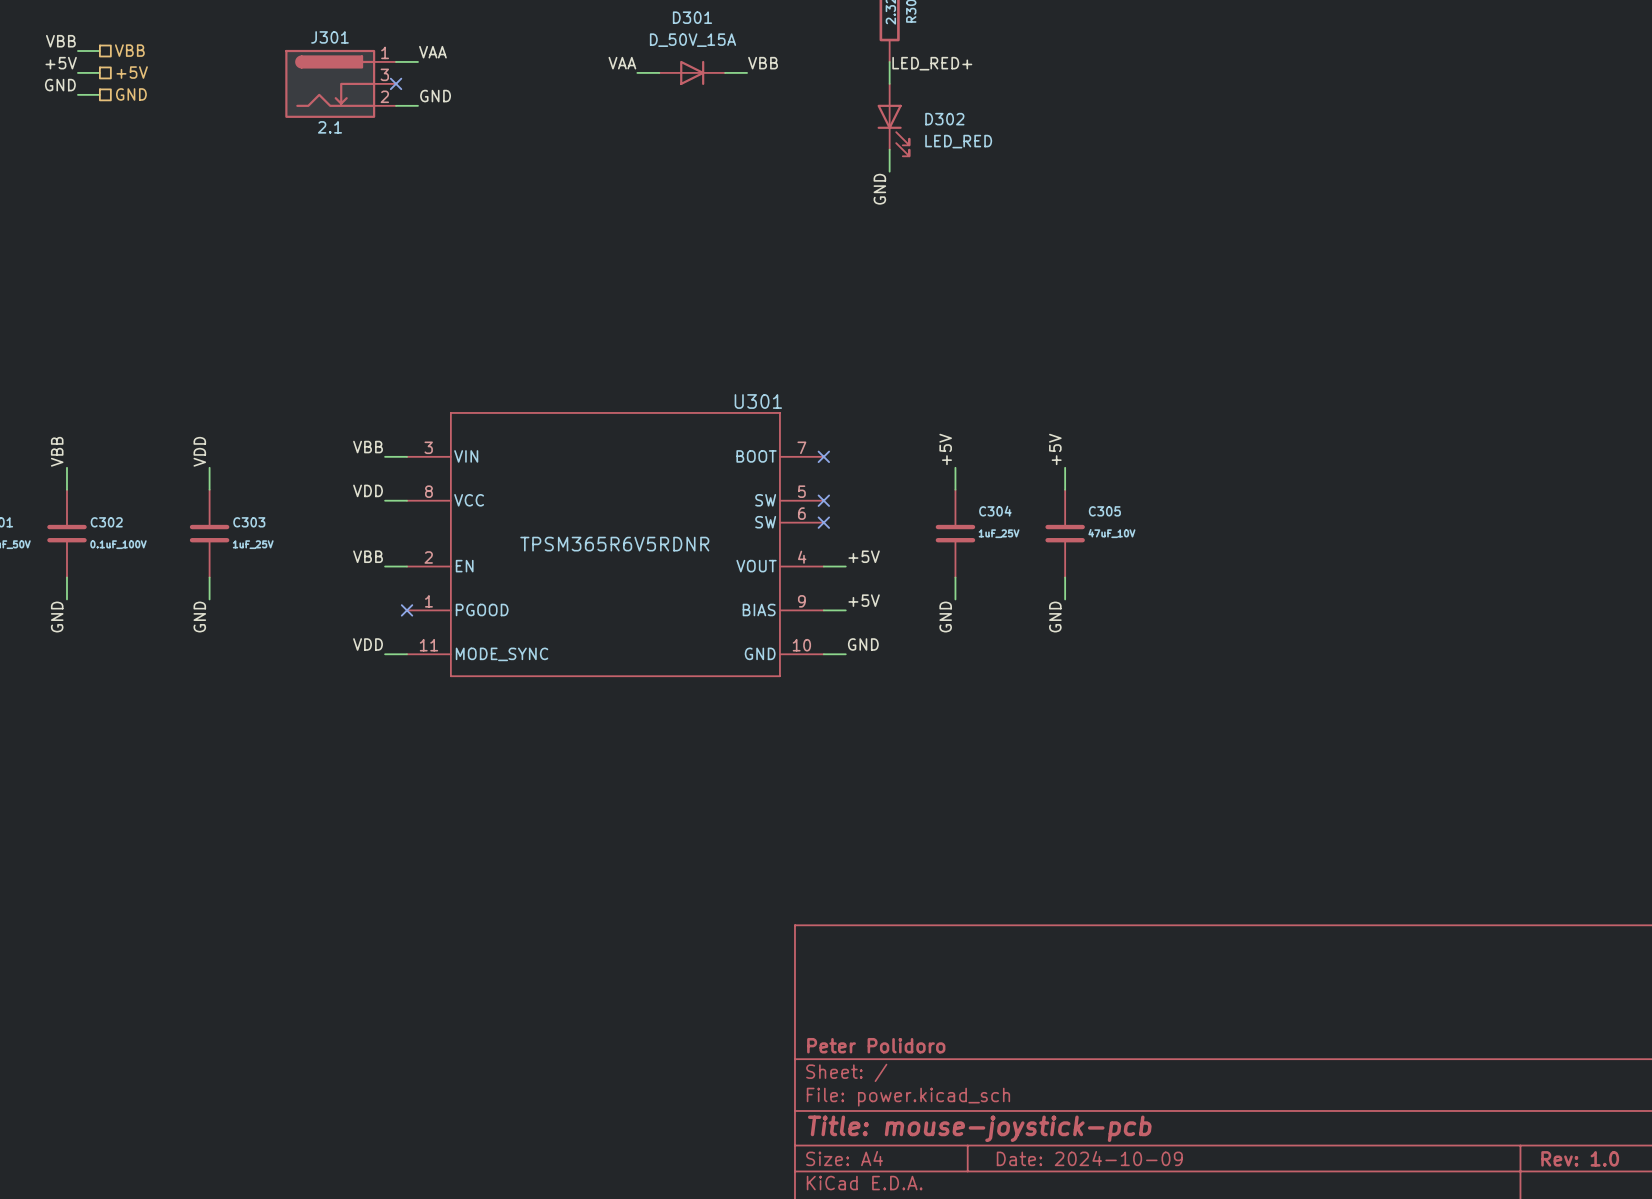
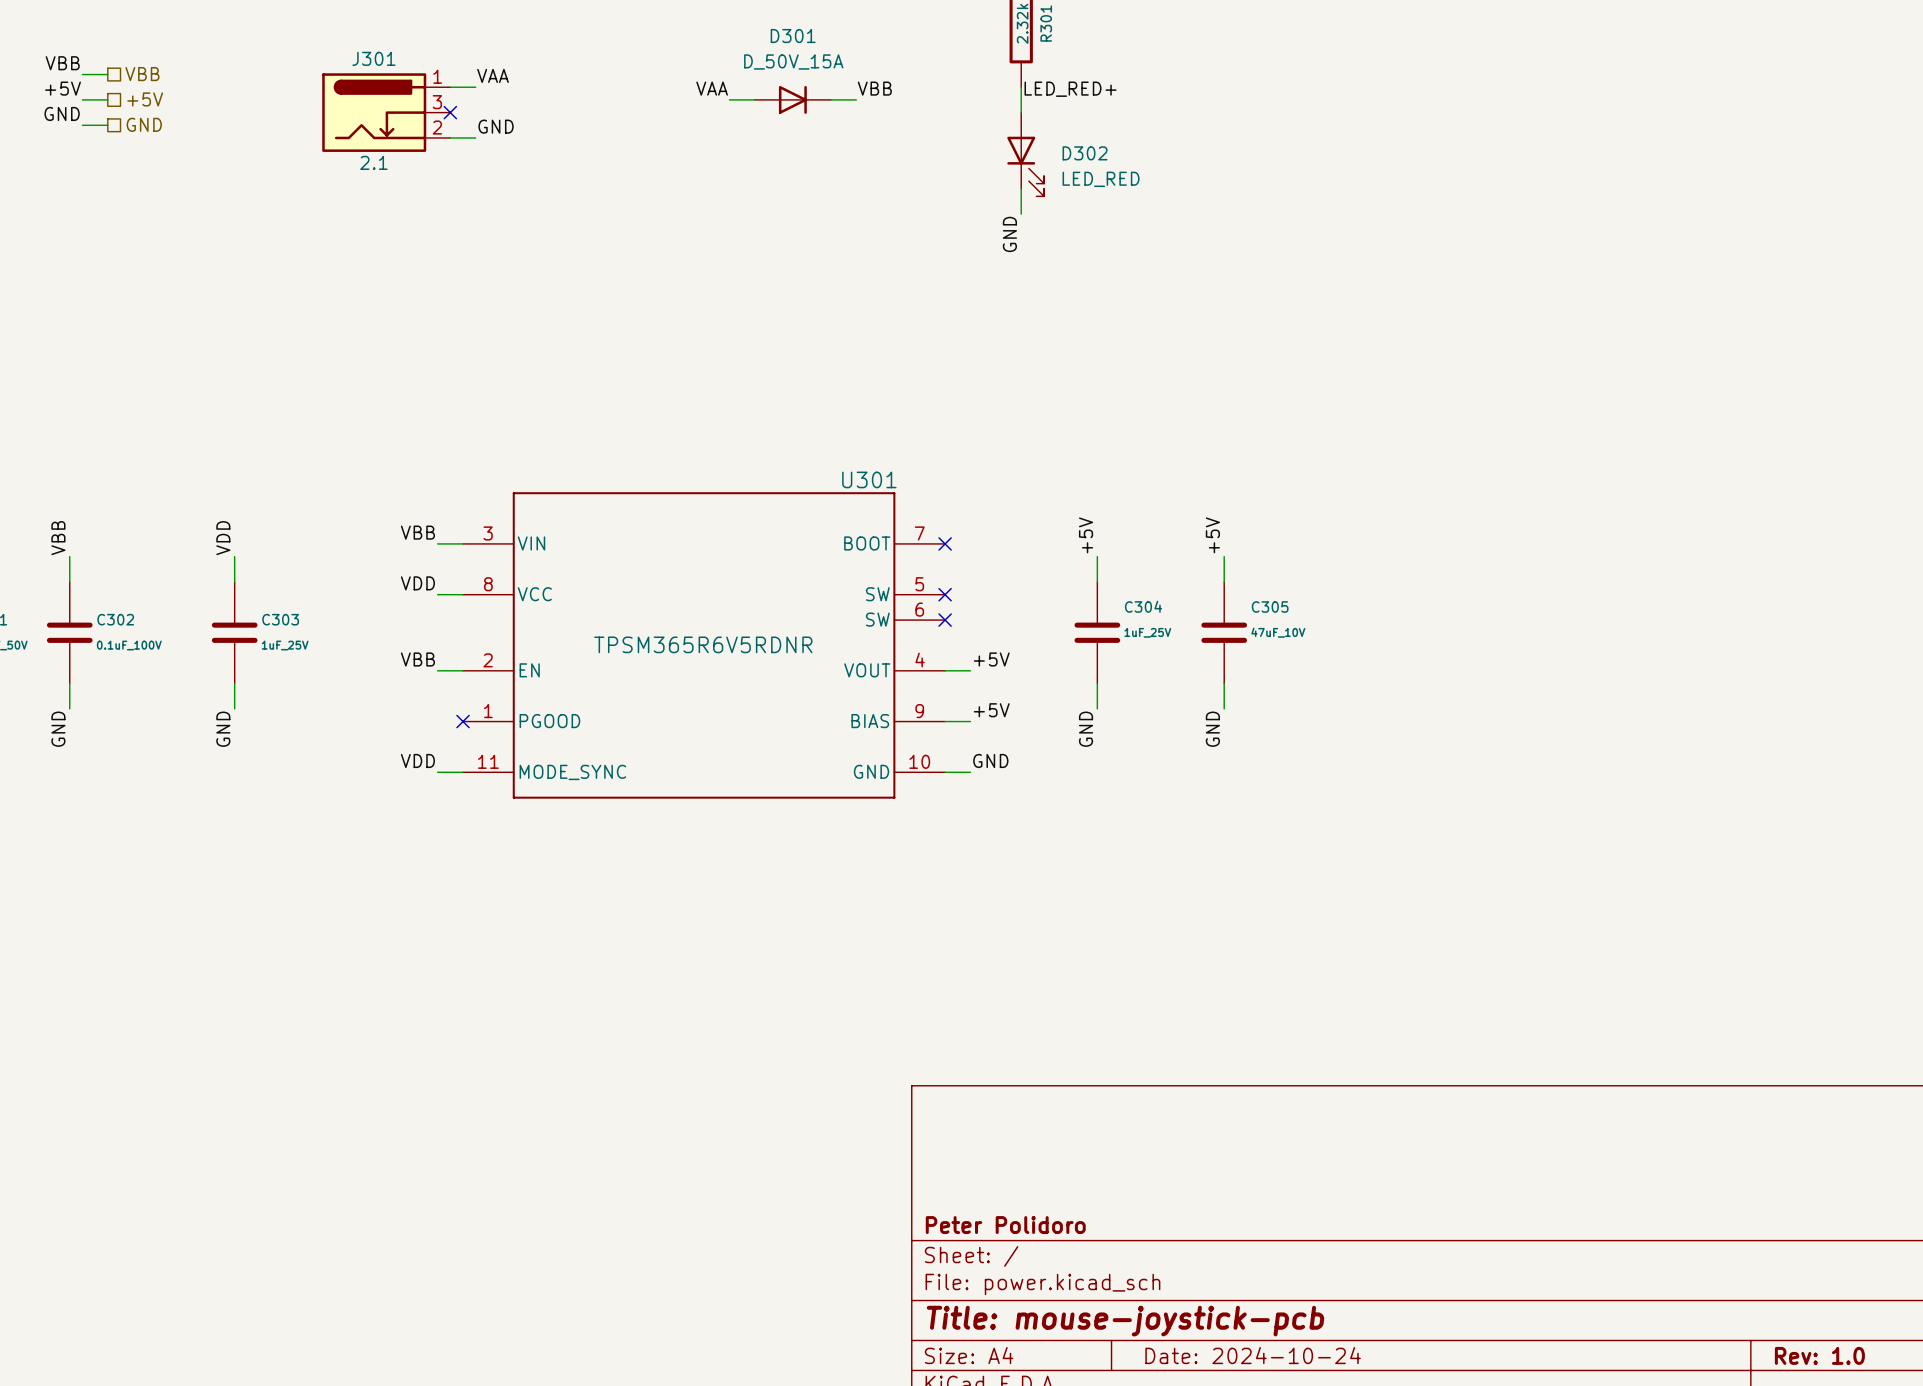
title block: Date: 2024-10-09 (1089, 1158) -> Date: 2024-10-24 (1253, 1355)

